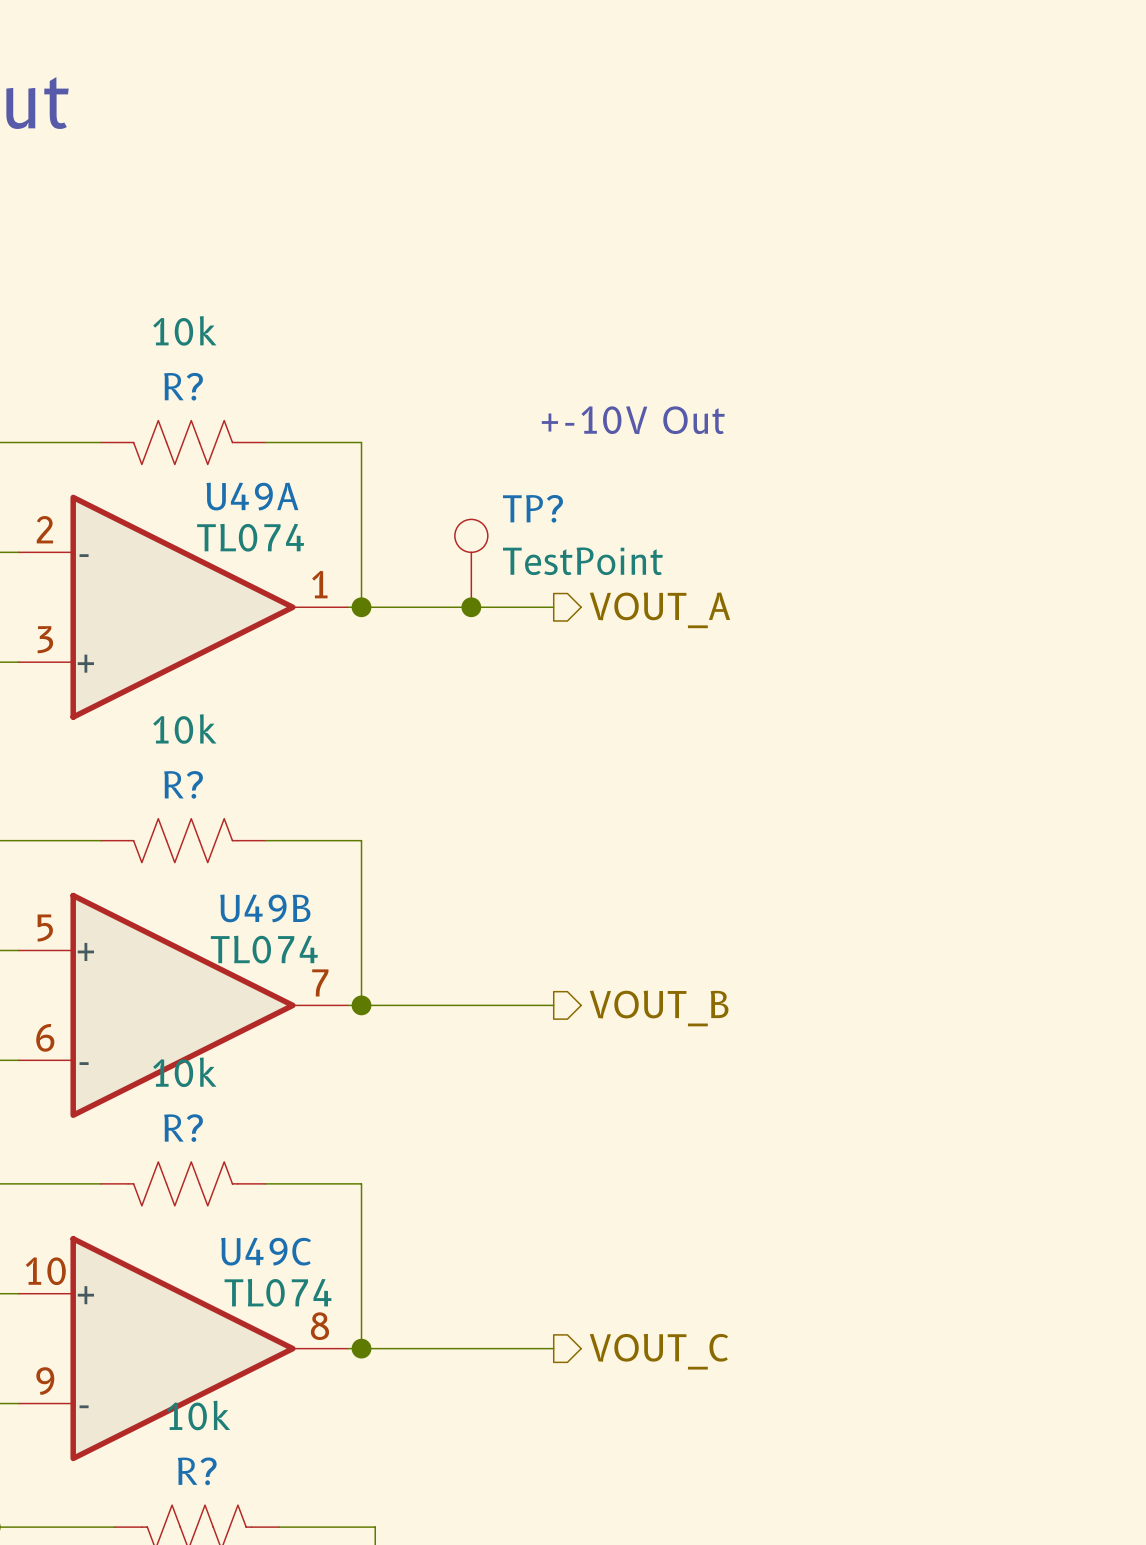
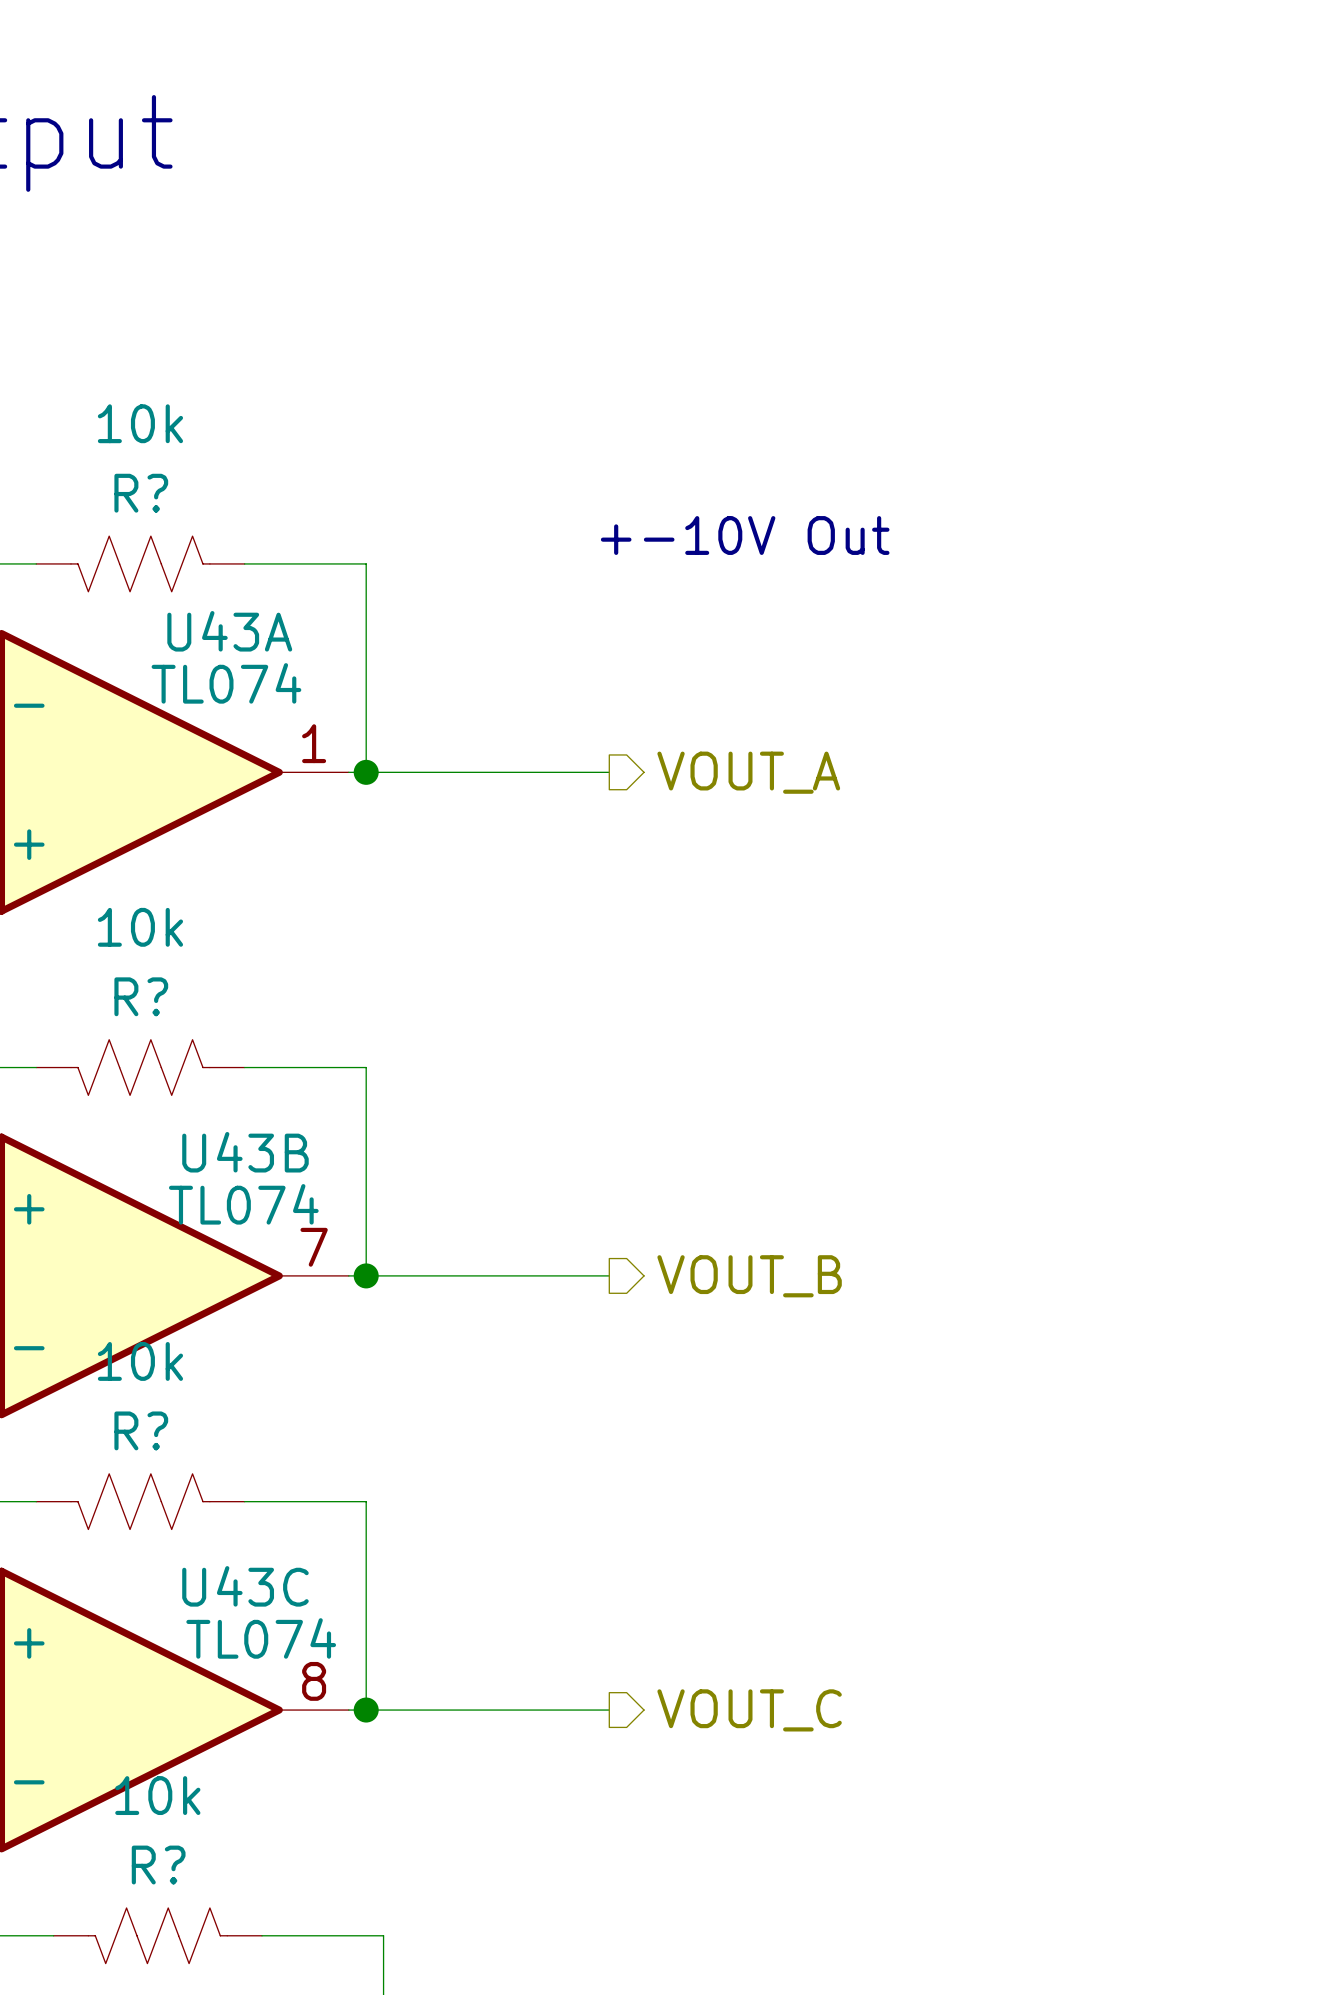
U49A name: U49A (252, 496) -> U43A (229, 631)
TP?: TestPoint (471, 563) -> none
junction: (471, 607) -> none
U49B name: U49B (265, 908) -> U43B (245, 1152)
U49C name: U49C (266, 1251) -> U43C (245, 1586)

